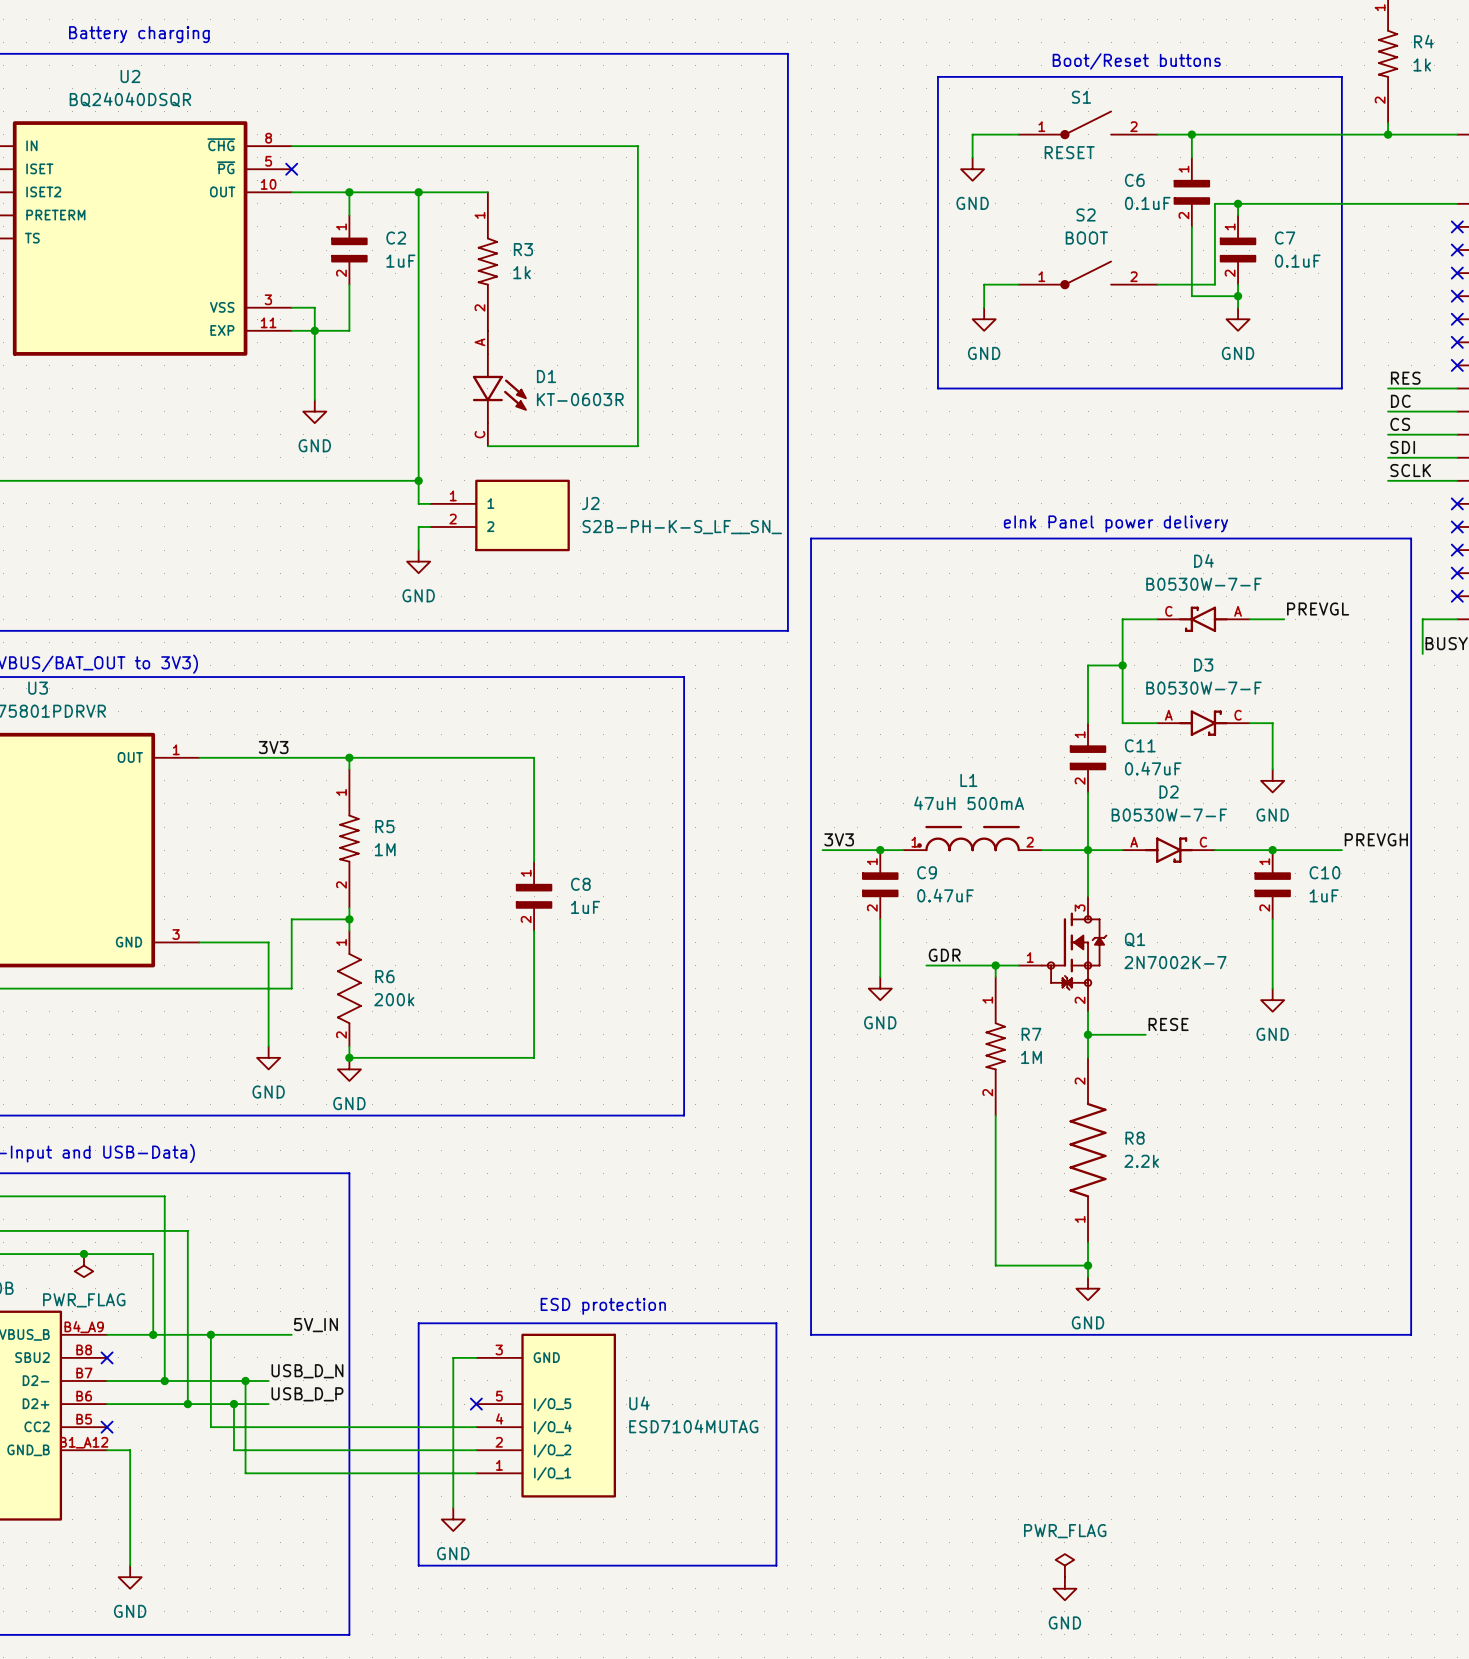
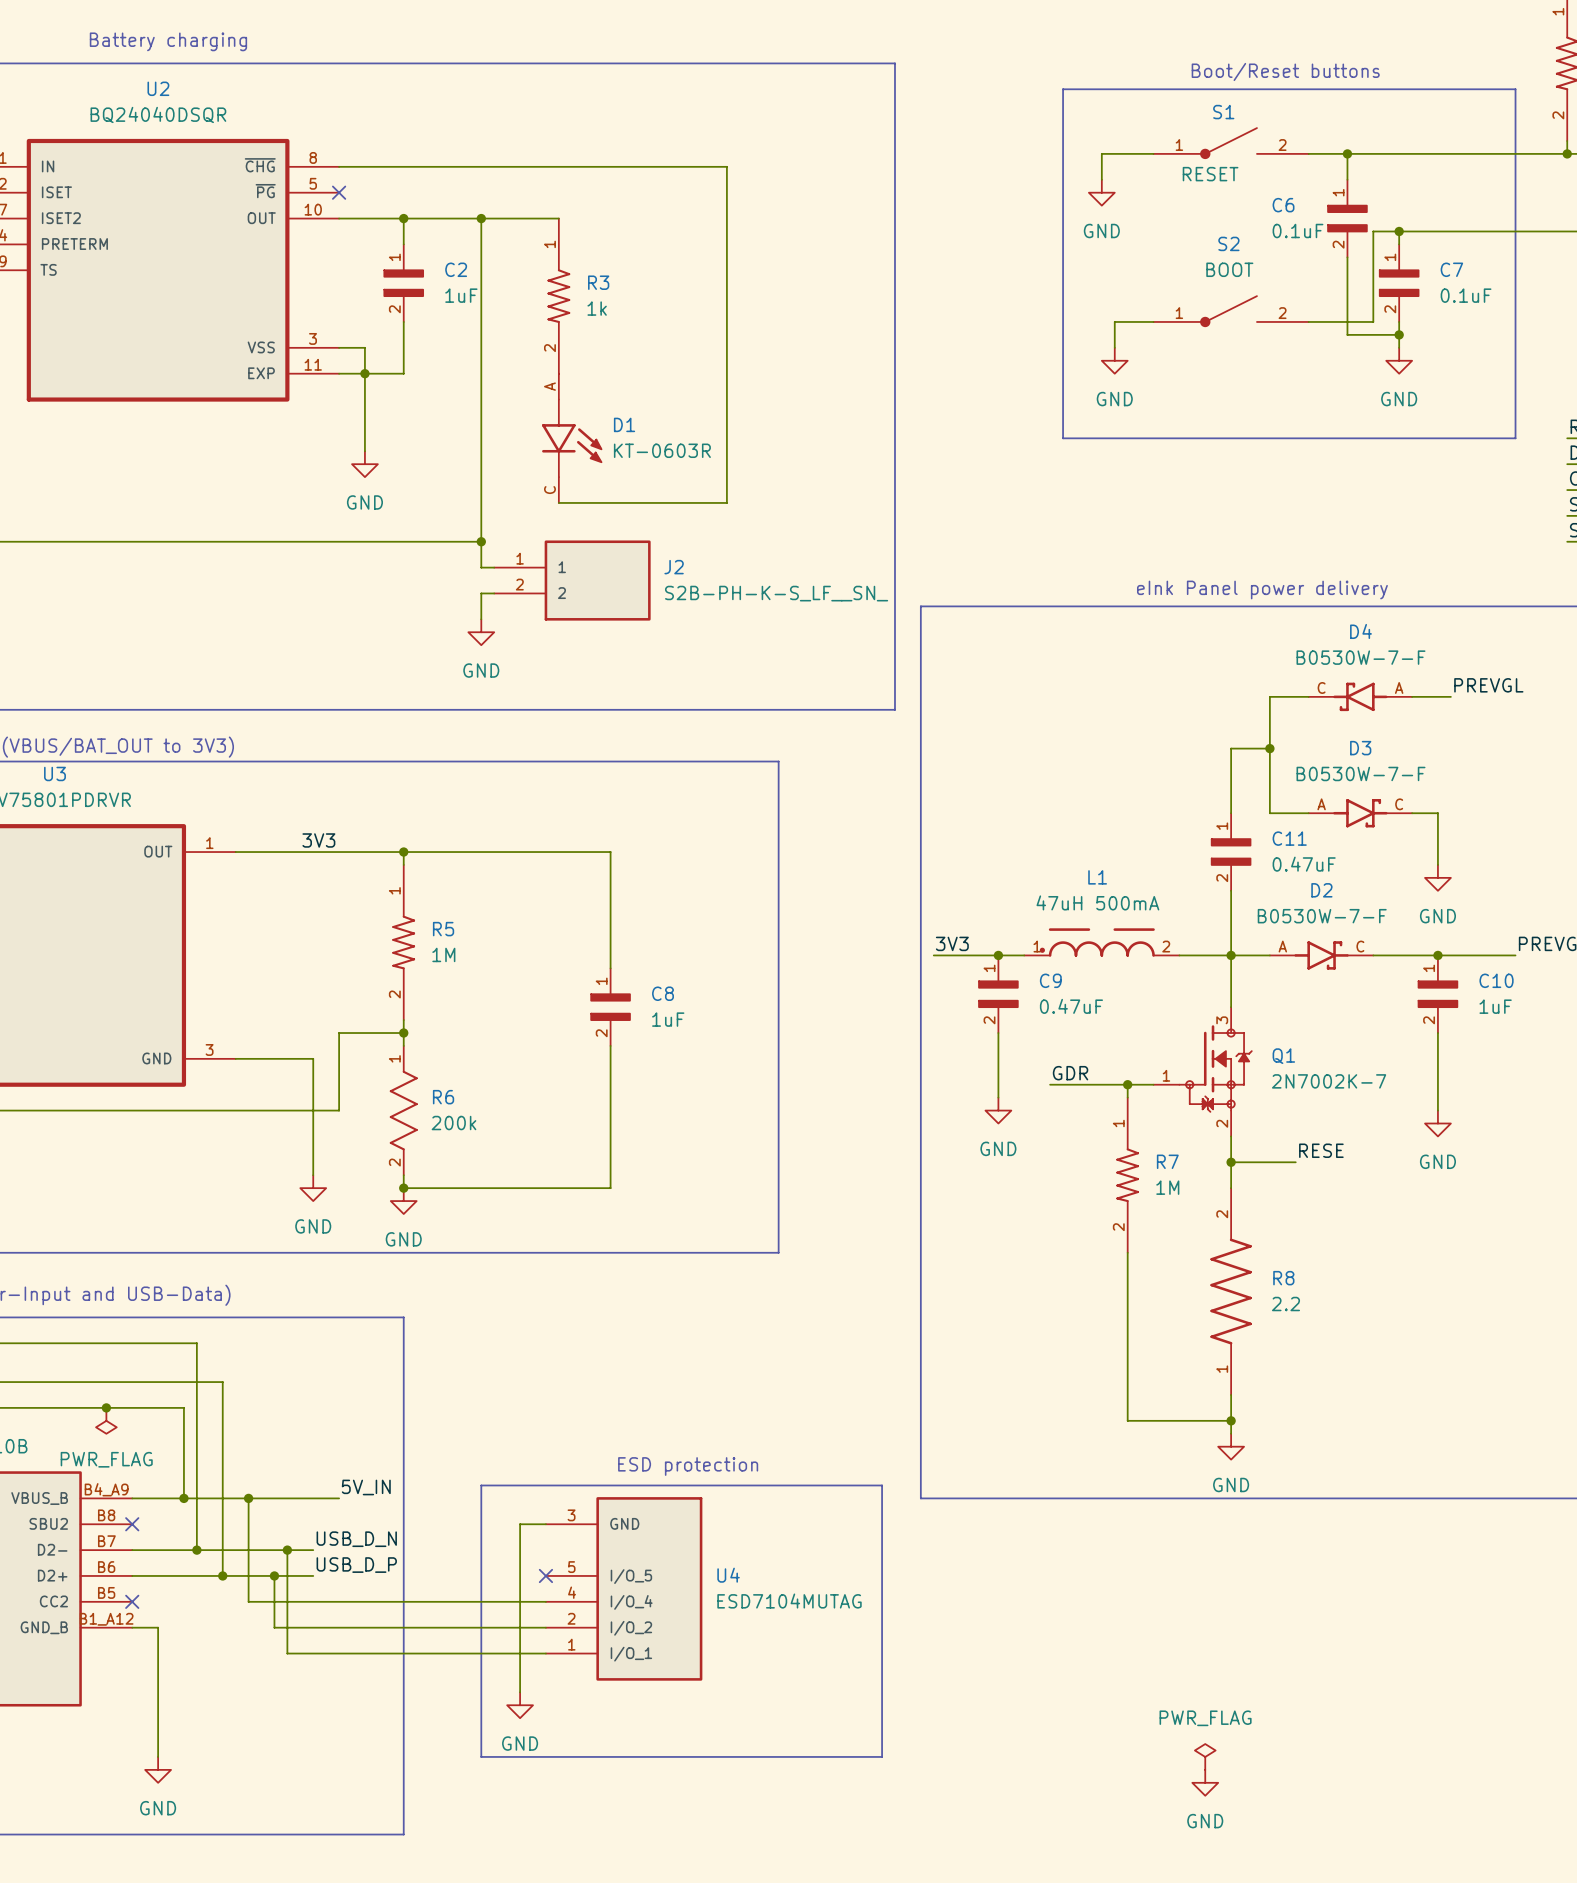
R8 value: 2.2k (1141, 1161) -> 2.2 (1286, 1304)

